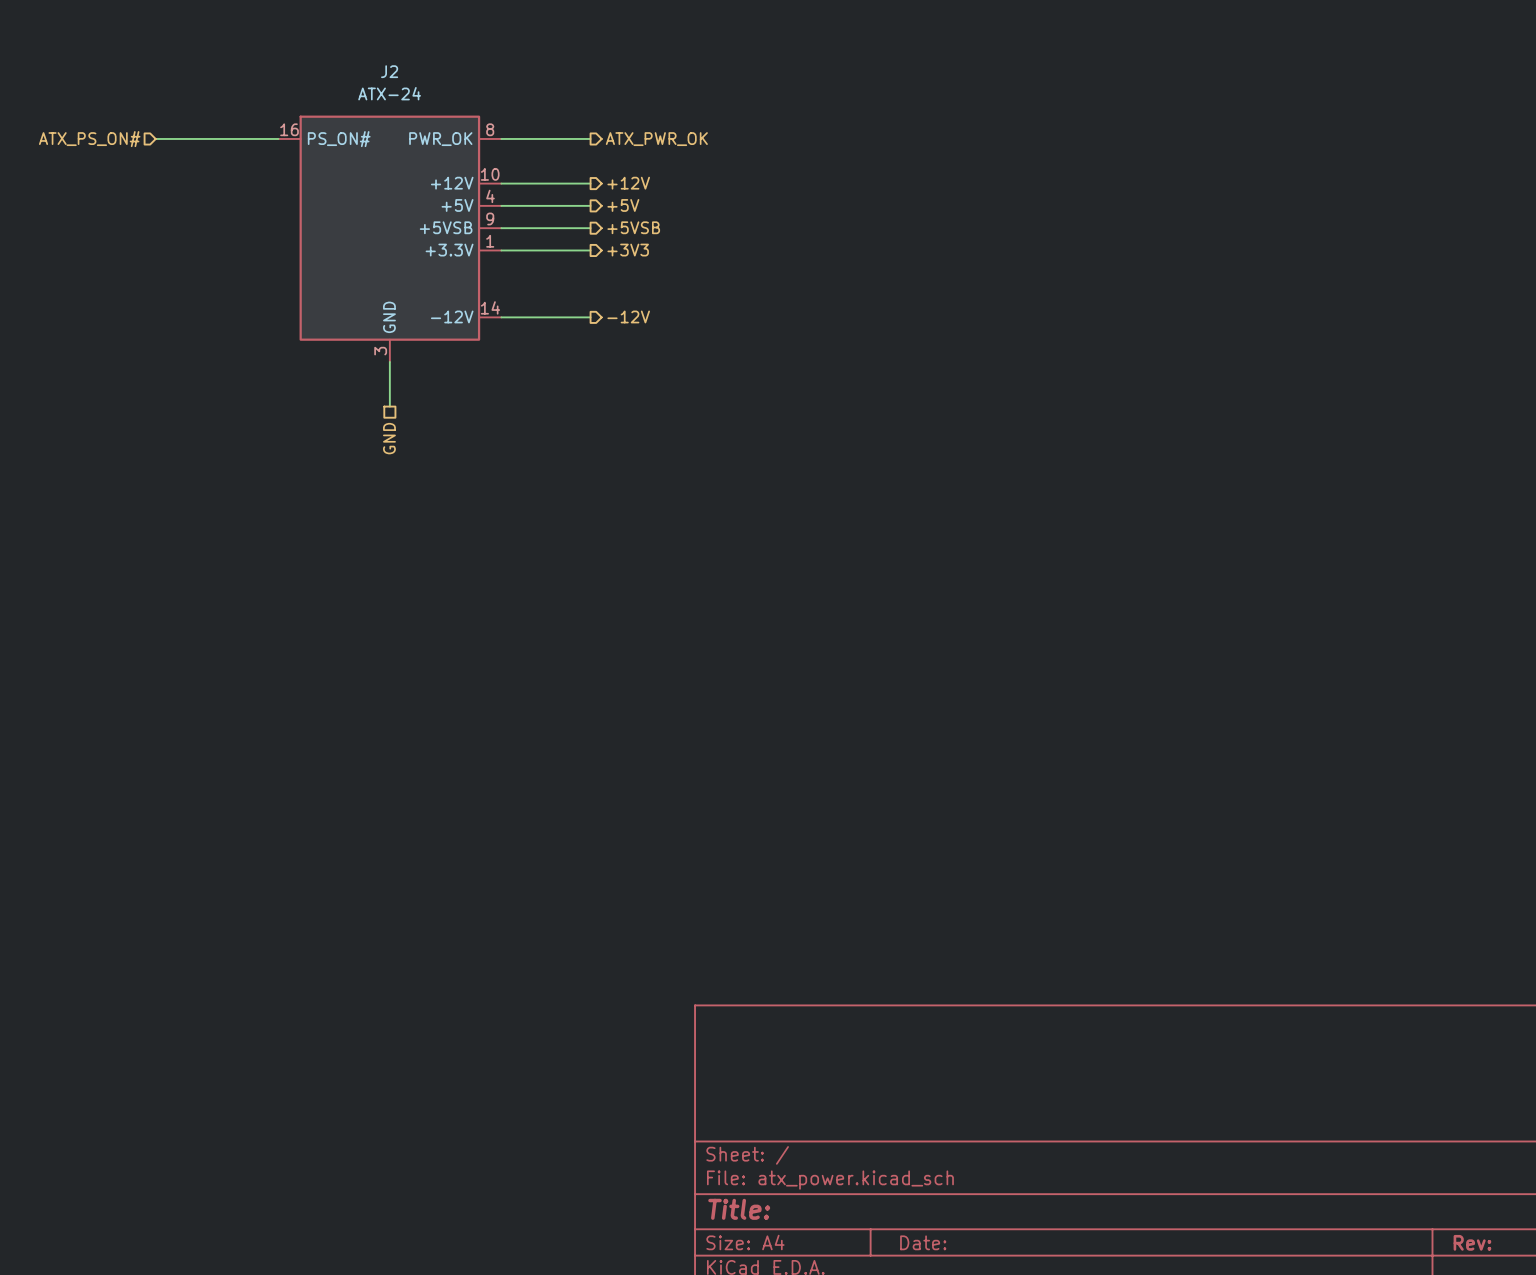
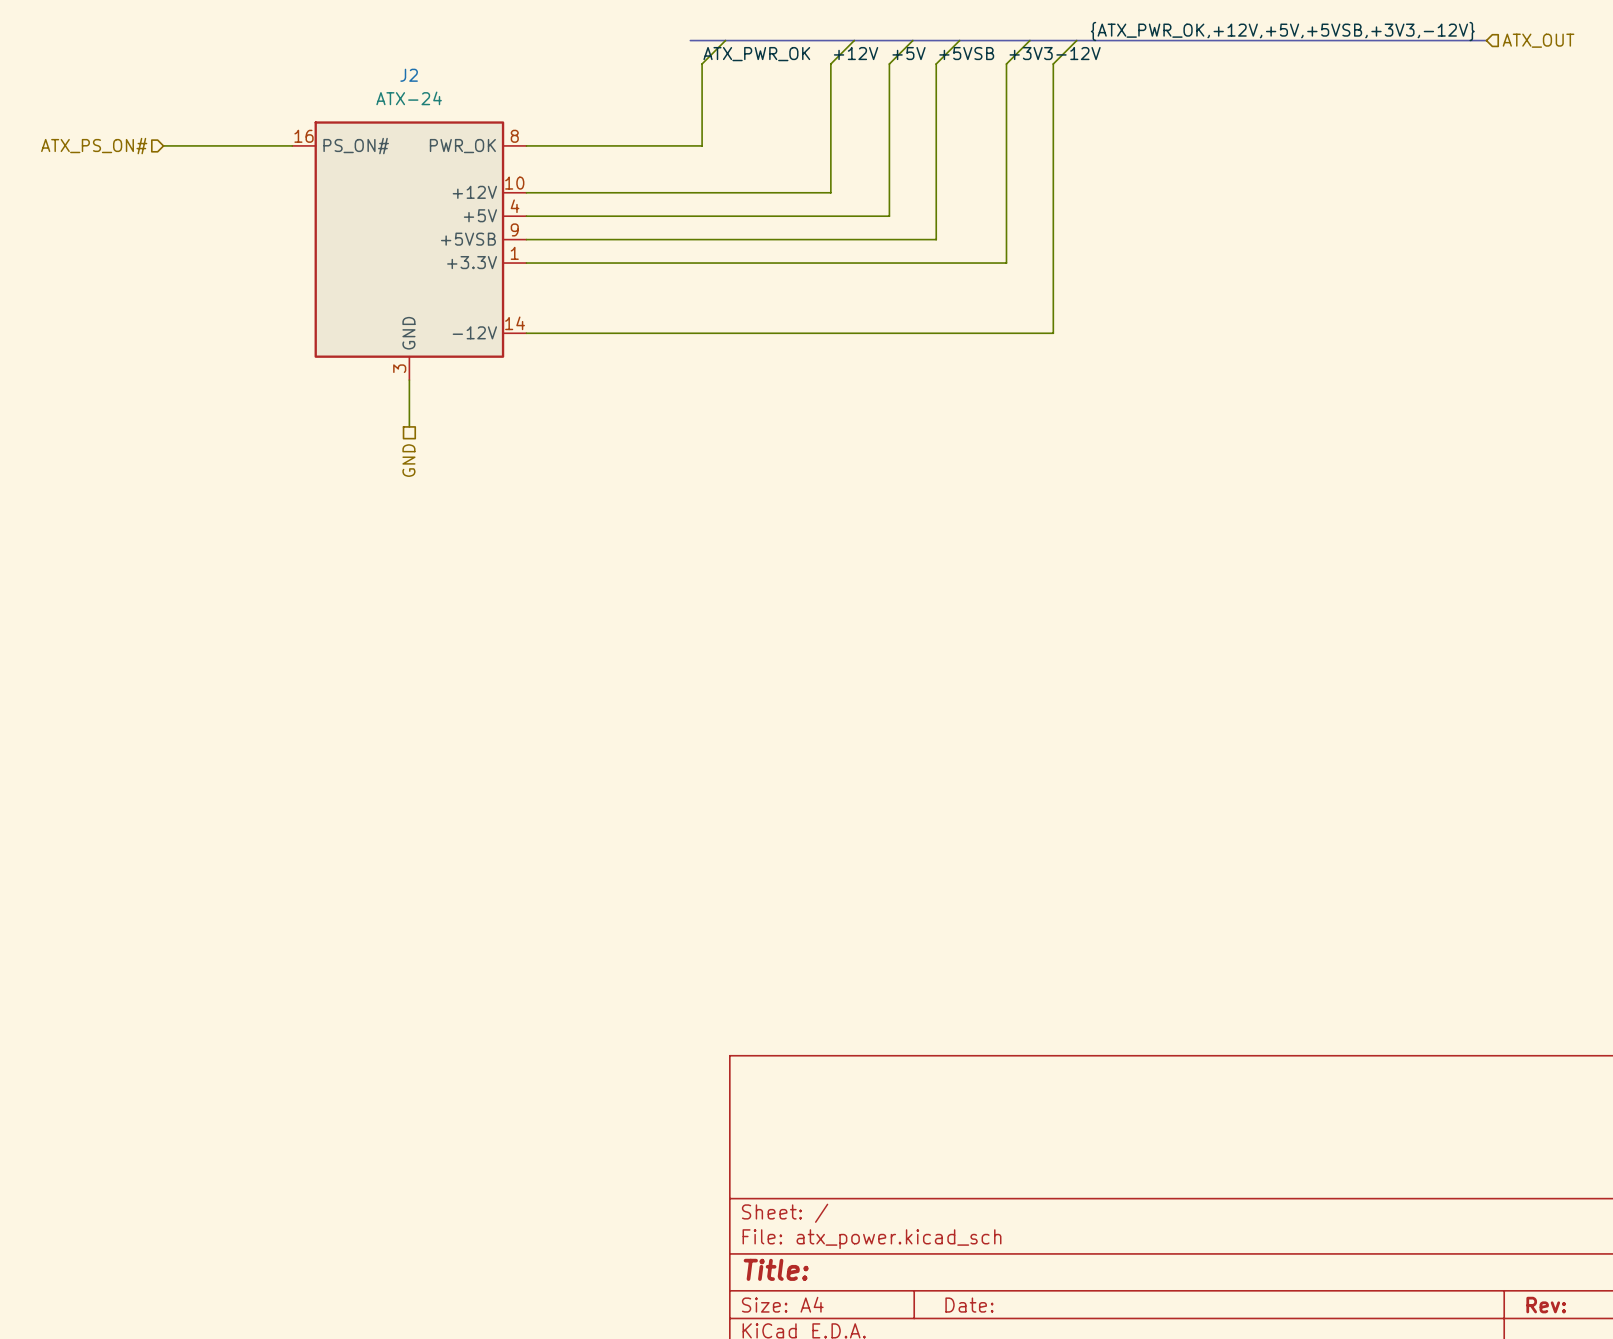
label: none -> {ATX_PWR_OK,+12V,+5V,+5VSB,+3V3,-12V} (1282, 31)
bus: none -> (690, 40) (1486, 40)
wire: none -> (725, 40) (702, 63) (702, 145) (620, 145)
wire: none -> (854, 40) (830, 63) (830, 192) (620, 192)
wire: none -> (912, 40) (889, 63) (889, 216) (620, 216)
wire: none -> (959, 40) (936, 63) (936, 239) (620, 239)
wire: none -> (1029, 40) (1006, 63) (1006, 263) (620, 263)
wire: none -> (1076, 40) (1053, 63) (1053, 333) (620, 333)
hierarchical label: none -> ATX_OUT (1538, 40)
label: none -> +12V (856, 53)
label: none -> +5V (909, 53)
label: none -> +5VSB (966, 53)
label: none -> +3V3 (1031, 53)
label: none -> -12V (1078, 53)
label: none -> ATX_PWR_OK (756, 54)
hierarchical label: ATX_PWR_OK (656, 139) -> none
hierarchical label: +12V (628, 183) -> none
hierarchical label: +5V (623, 205) -> none
hierarchical label: +5VSB (633, 227) -> none
hierarchical label: +3V3 (628, 250) -> none
hierarchical label: -12V (628, 316) -> none

